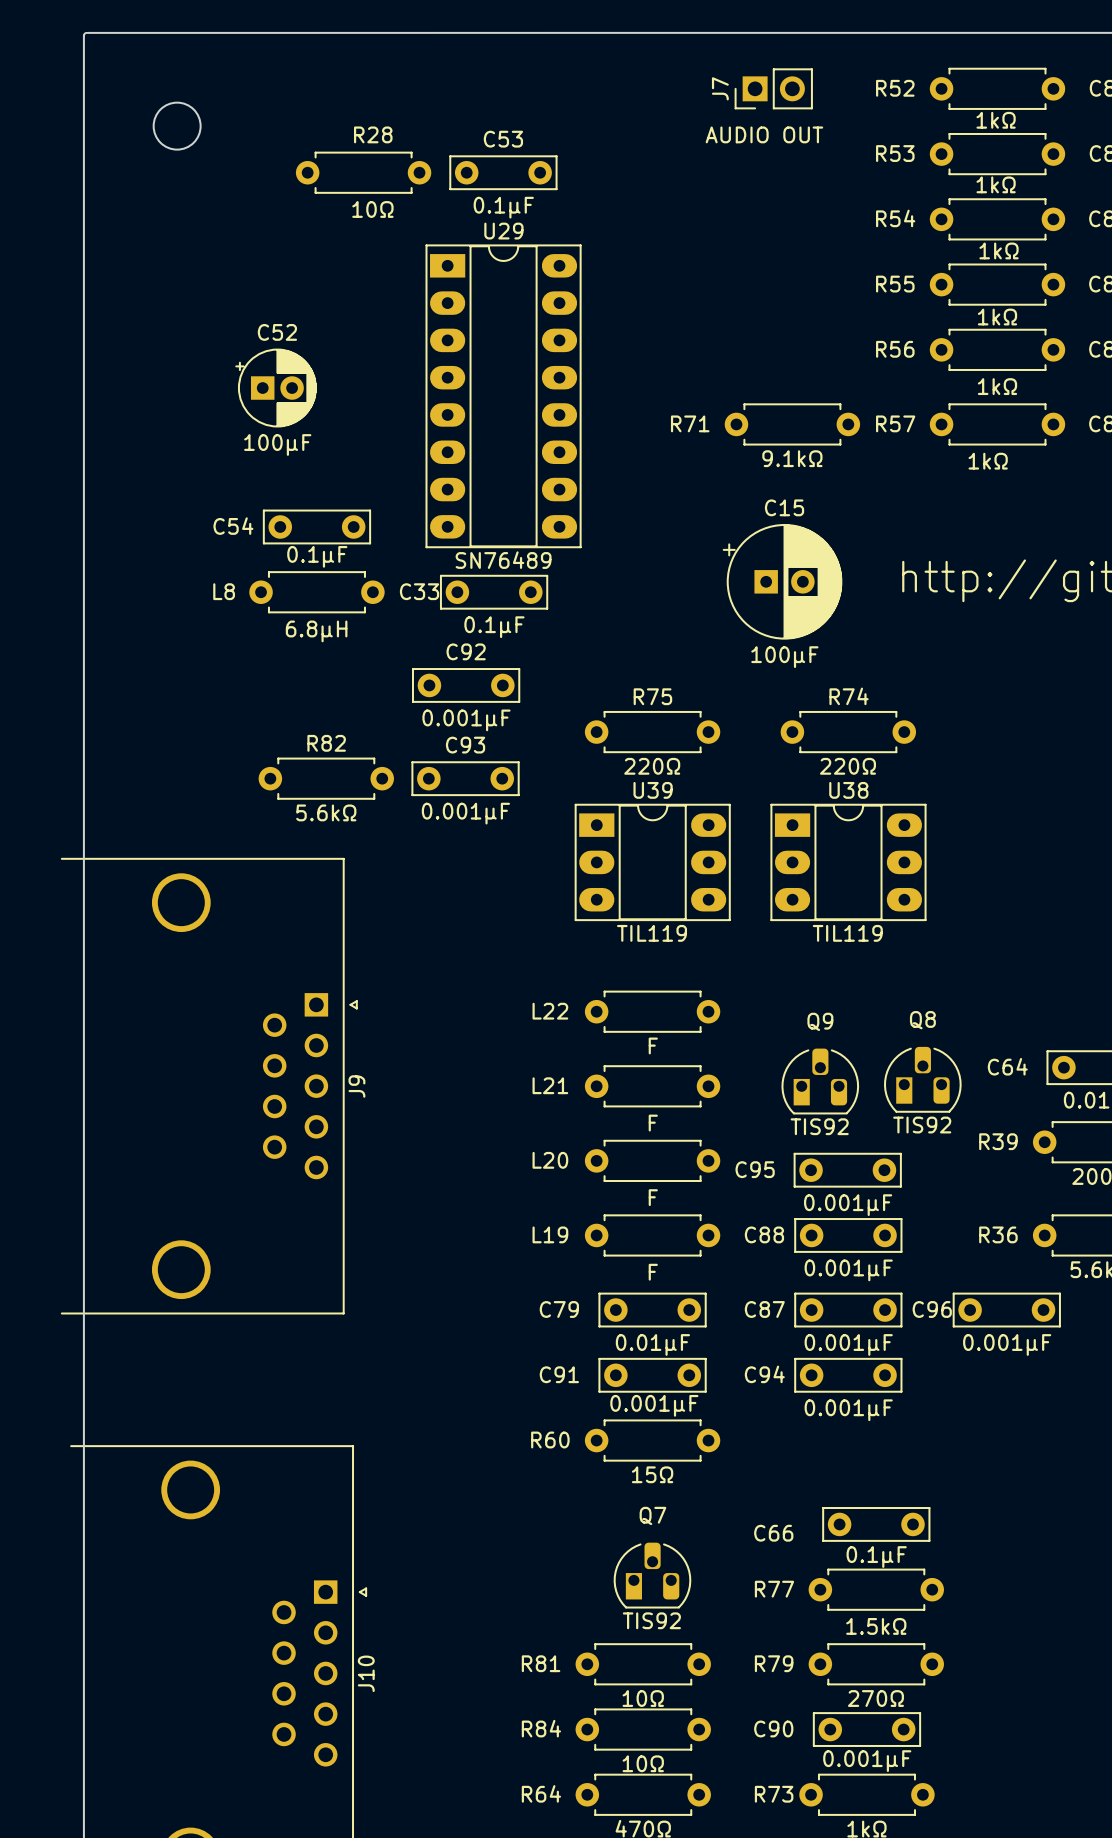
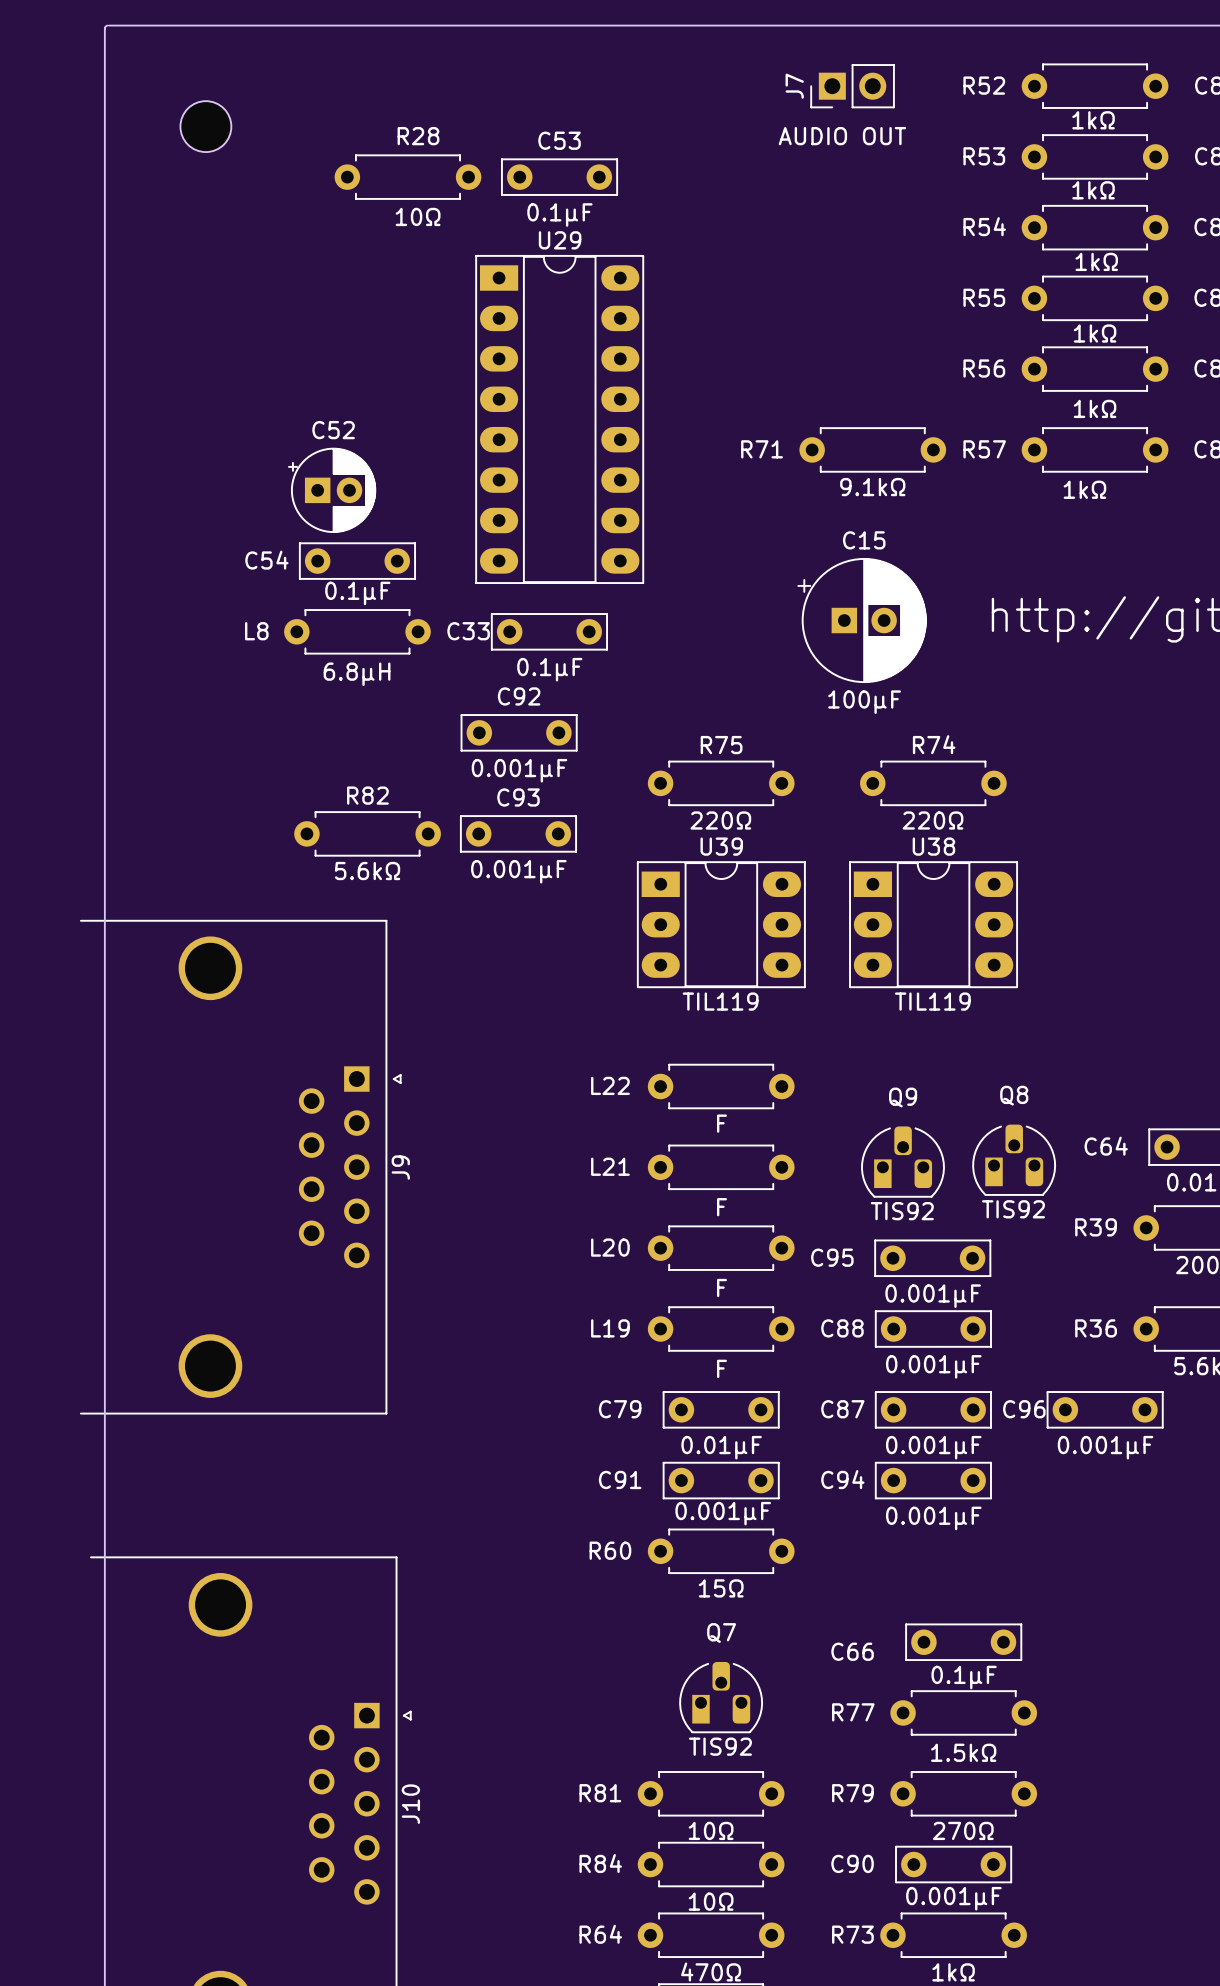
C52 position: (276, 388) -> (332, 490)
C52 value: 100µF (277, 444) -> none
U29 value: SN76489 (503, 560) -> none

